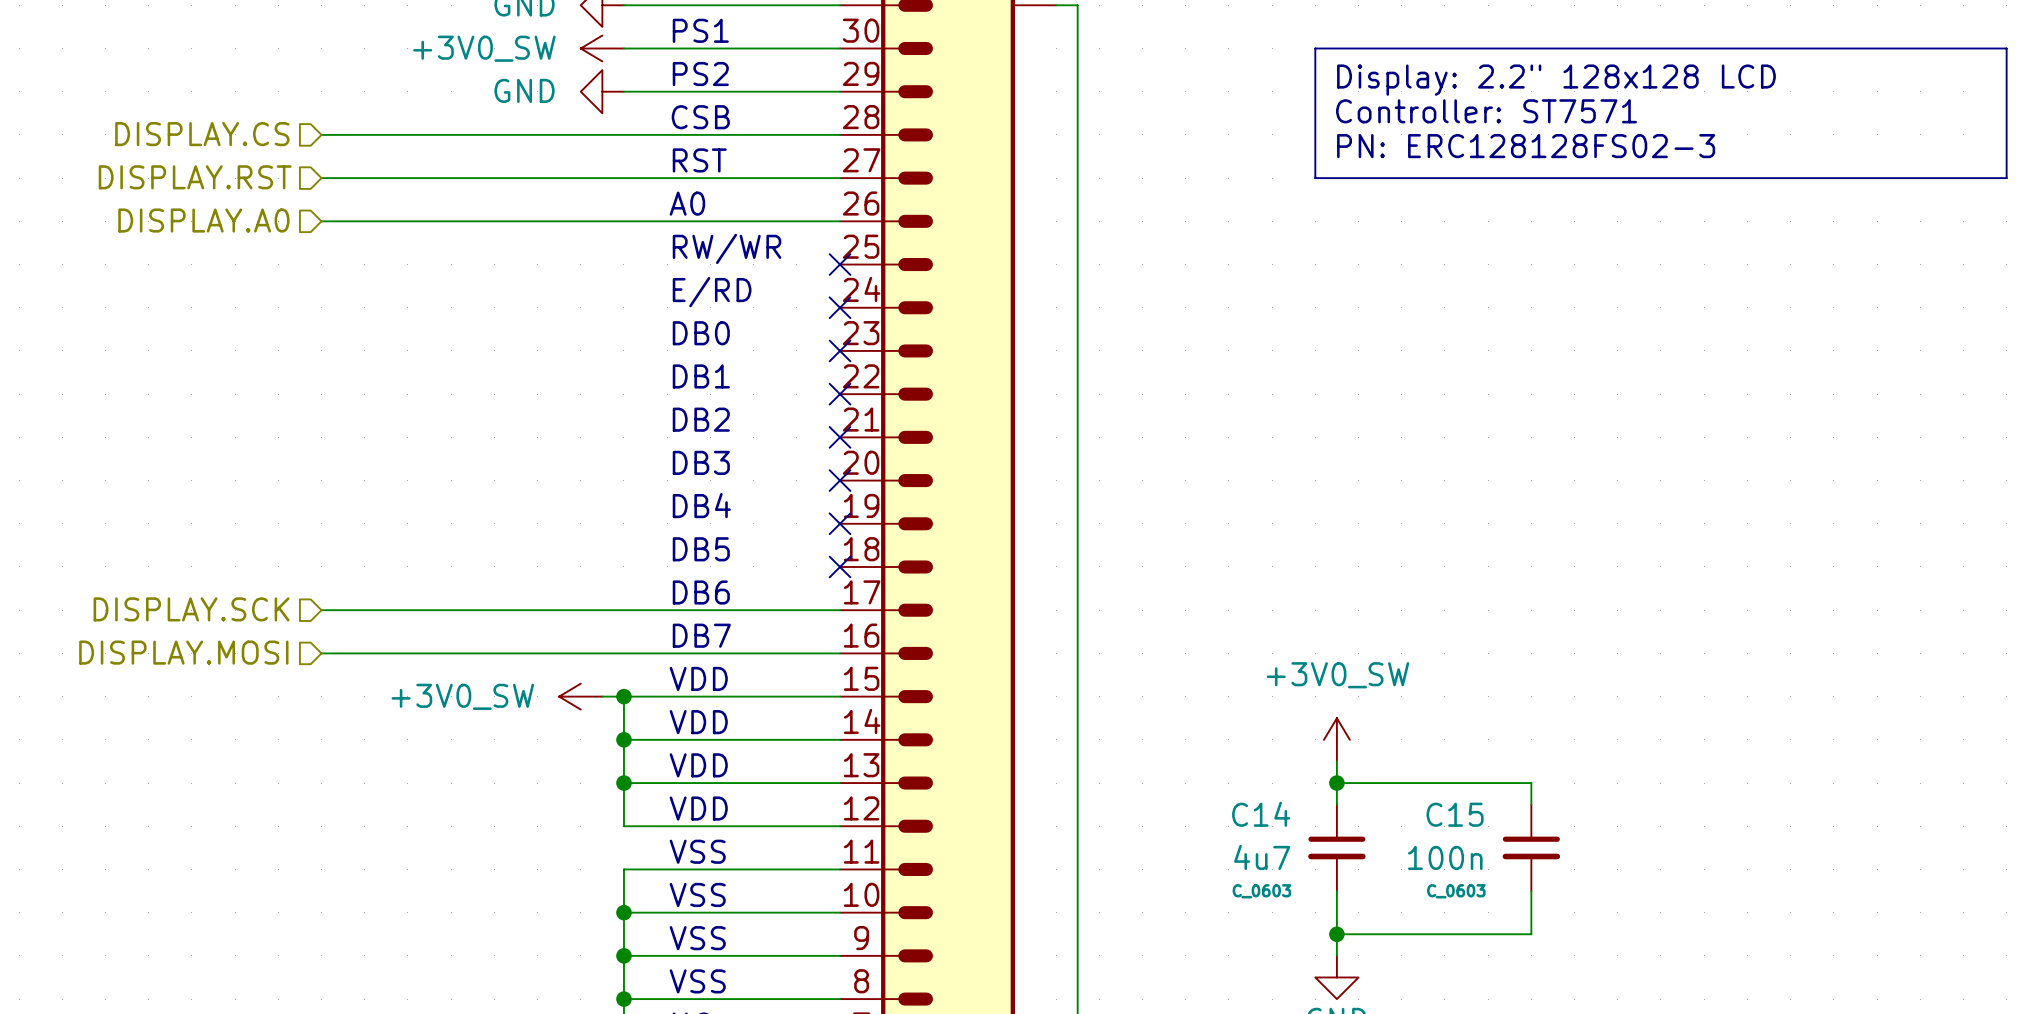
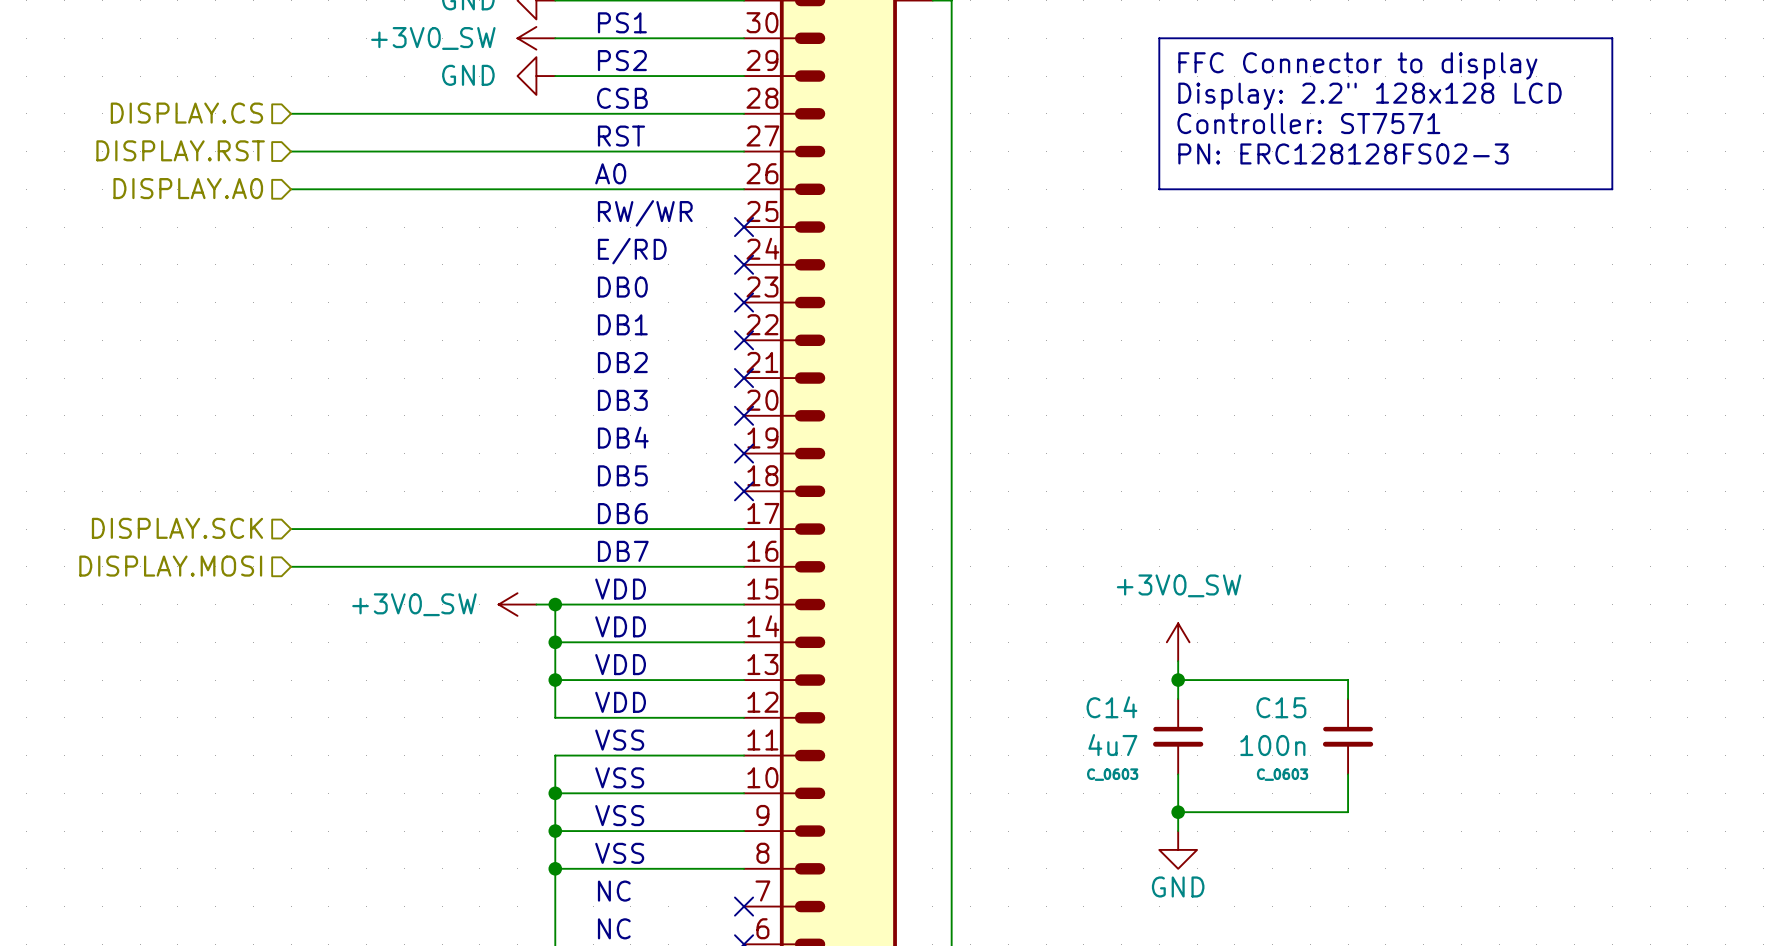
line: (1833, 48) (2006, 48) (2006, 178) (1315, 178) -> (1612, 38) (1612, 189) (1159, 189) (1159, 151)
text: Display: 2.2" 128x128 LCD (1556, 80) -> FFC Connector to display (1357, 65)
text: Controller: ST7571 (1486, 111) -> Display: 2.2" 128x128 LCD (1369, 96)
text: PN: ERC128128FS02-3 (1526, 146) -> Controller: ST7571 (1308, 123)
text: none -> PN: ERC128128FS02-3 (1343, 153)

